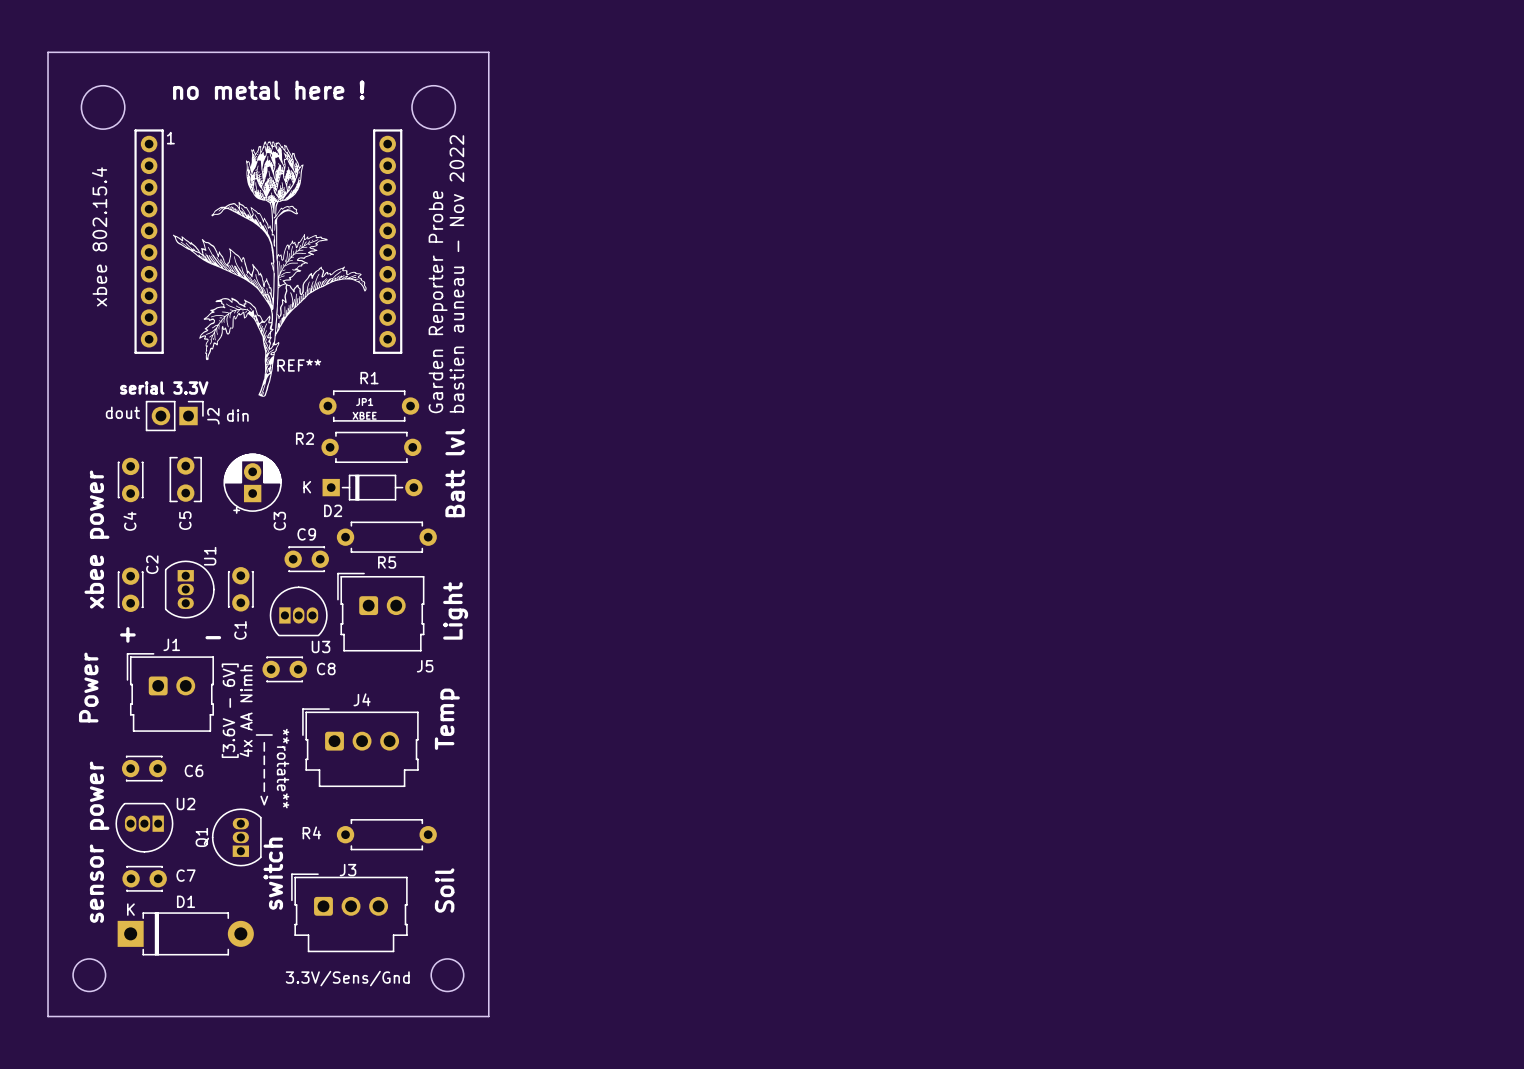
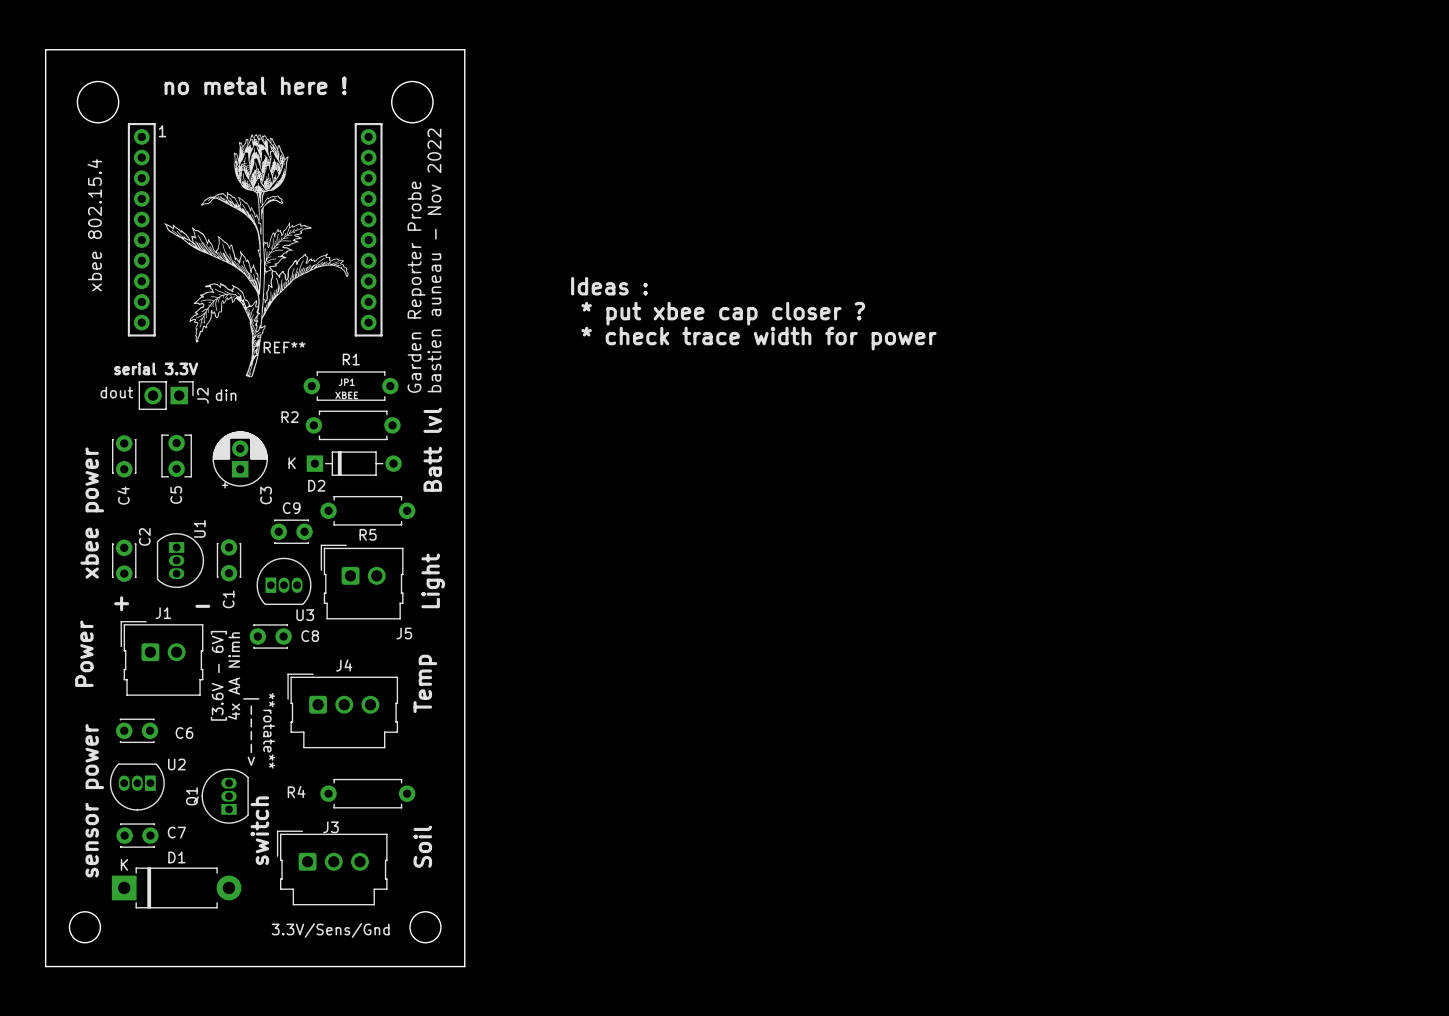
text: none -> Ideas : (609, 286)
text: none -> * put xbee cap closer ? (723, 313)
text: none -> * check trace width for power (759, 338)

